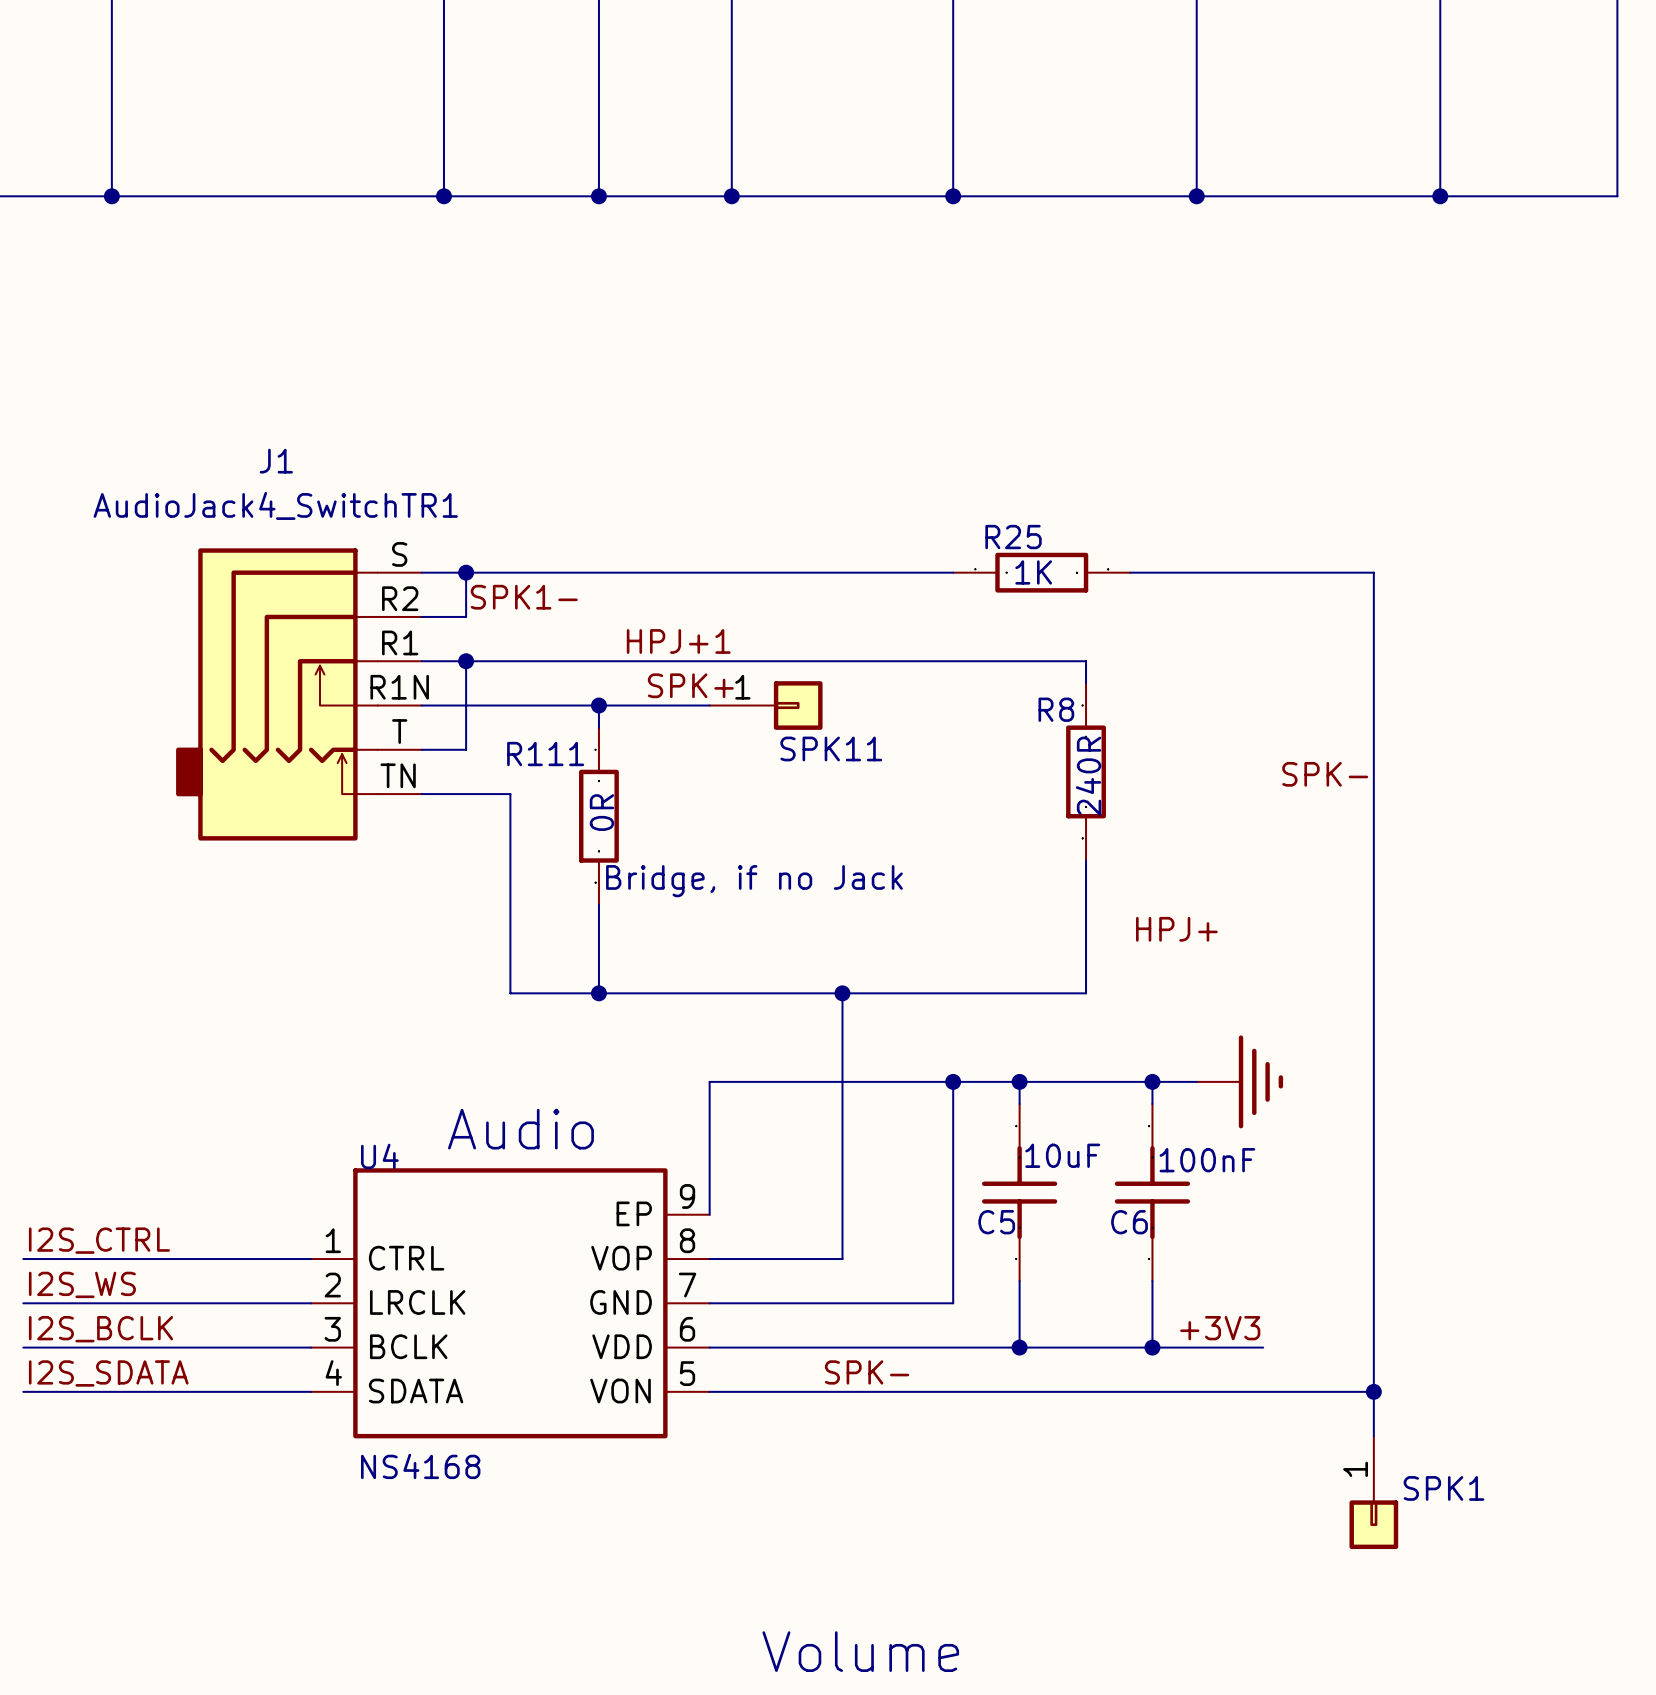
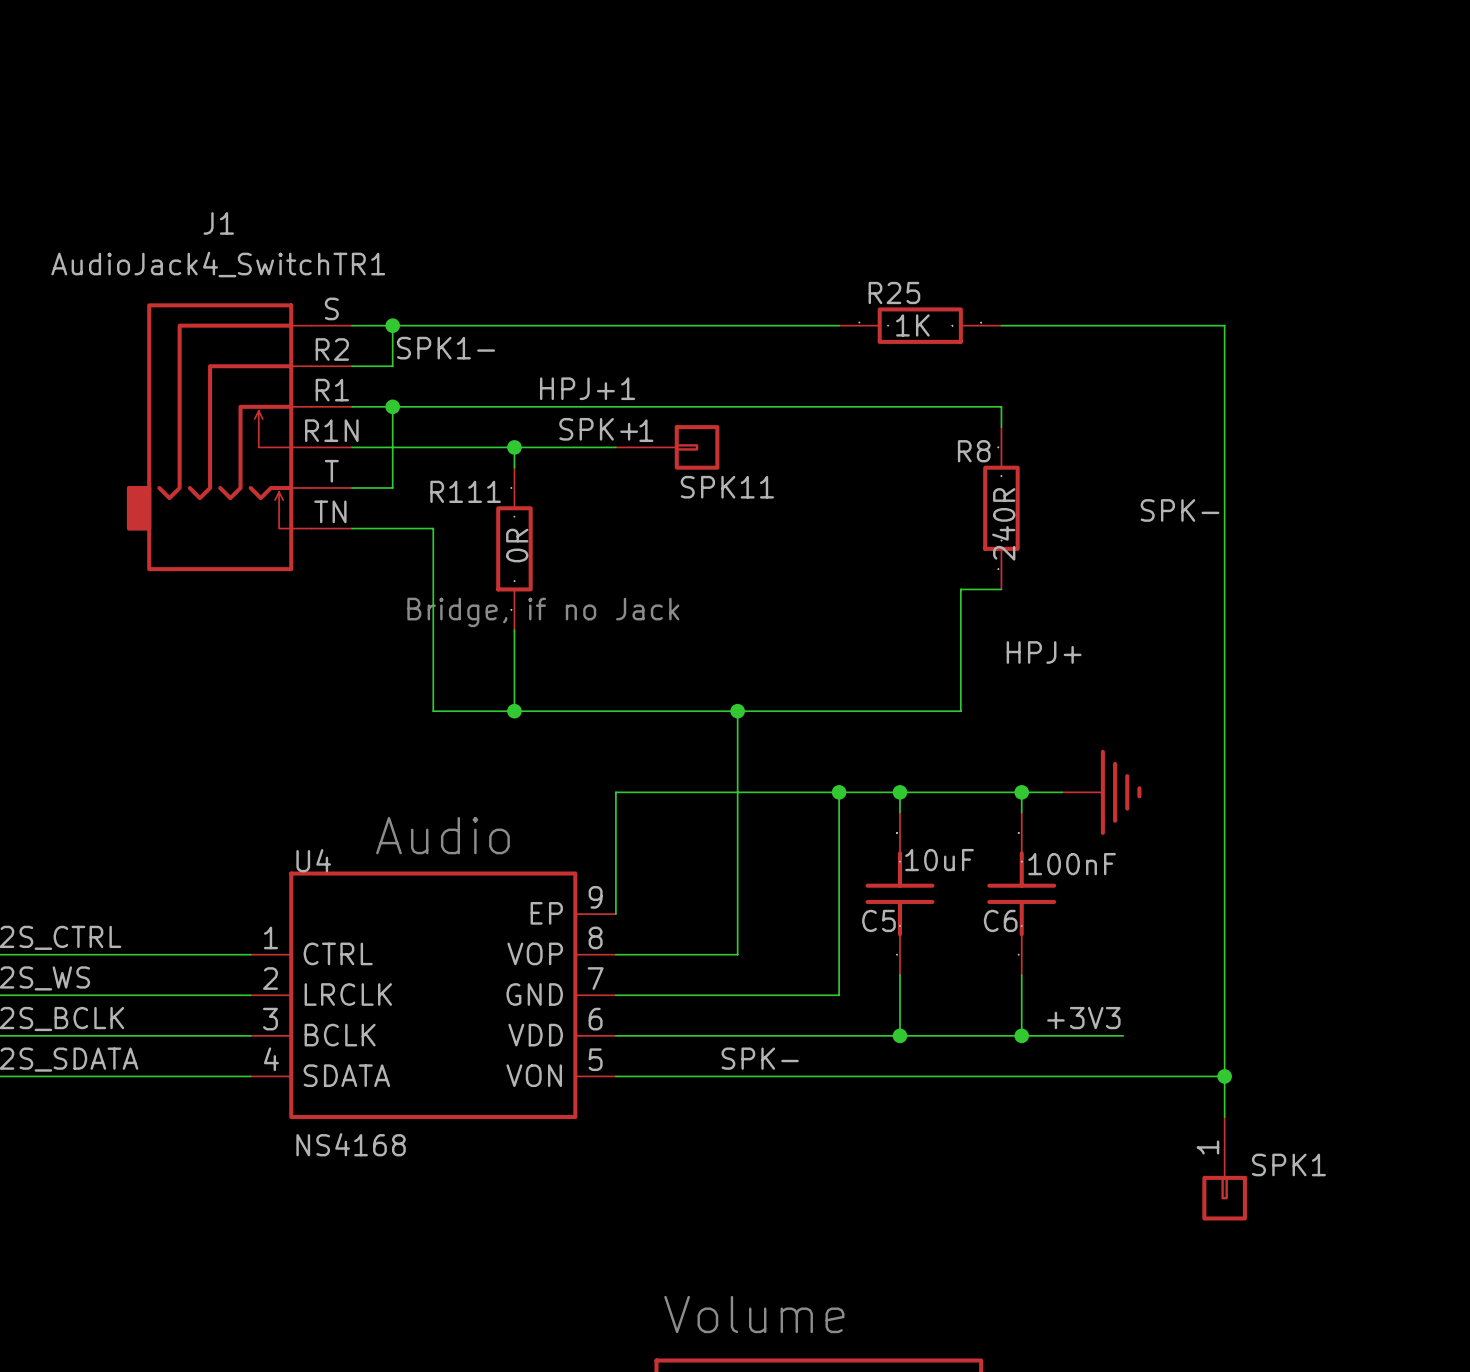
wire: (1086, 661) (1086, 683) -> (960, 406) (1001, 406) (1001, 427)
R8 position: (1086, 771) -> (1001, 508)
R8 value position: 240R (1088, 776) -> 240R (1003, 524)
wire: none -> (960, 589) (1001, 589)
text position: Bridge, if no Jack (754, 881) -> Bridge, if no Jack (543, 612)

